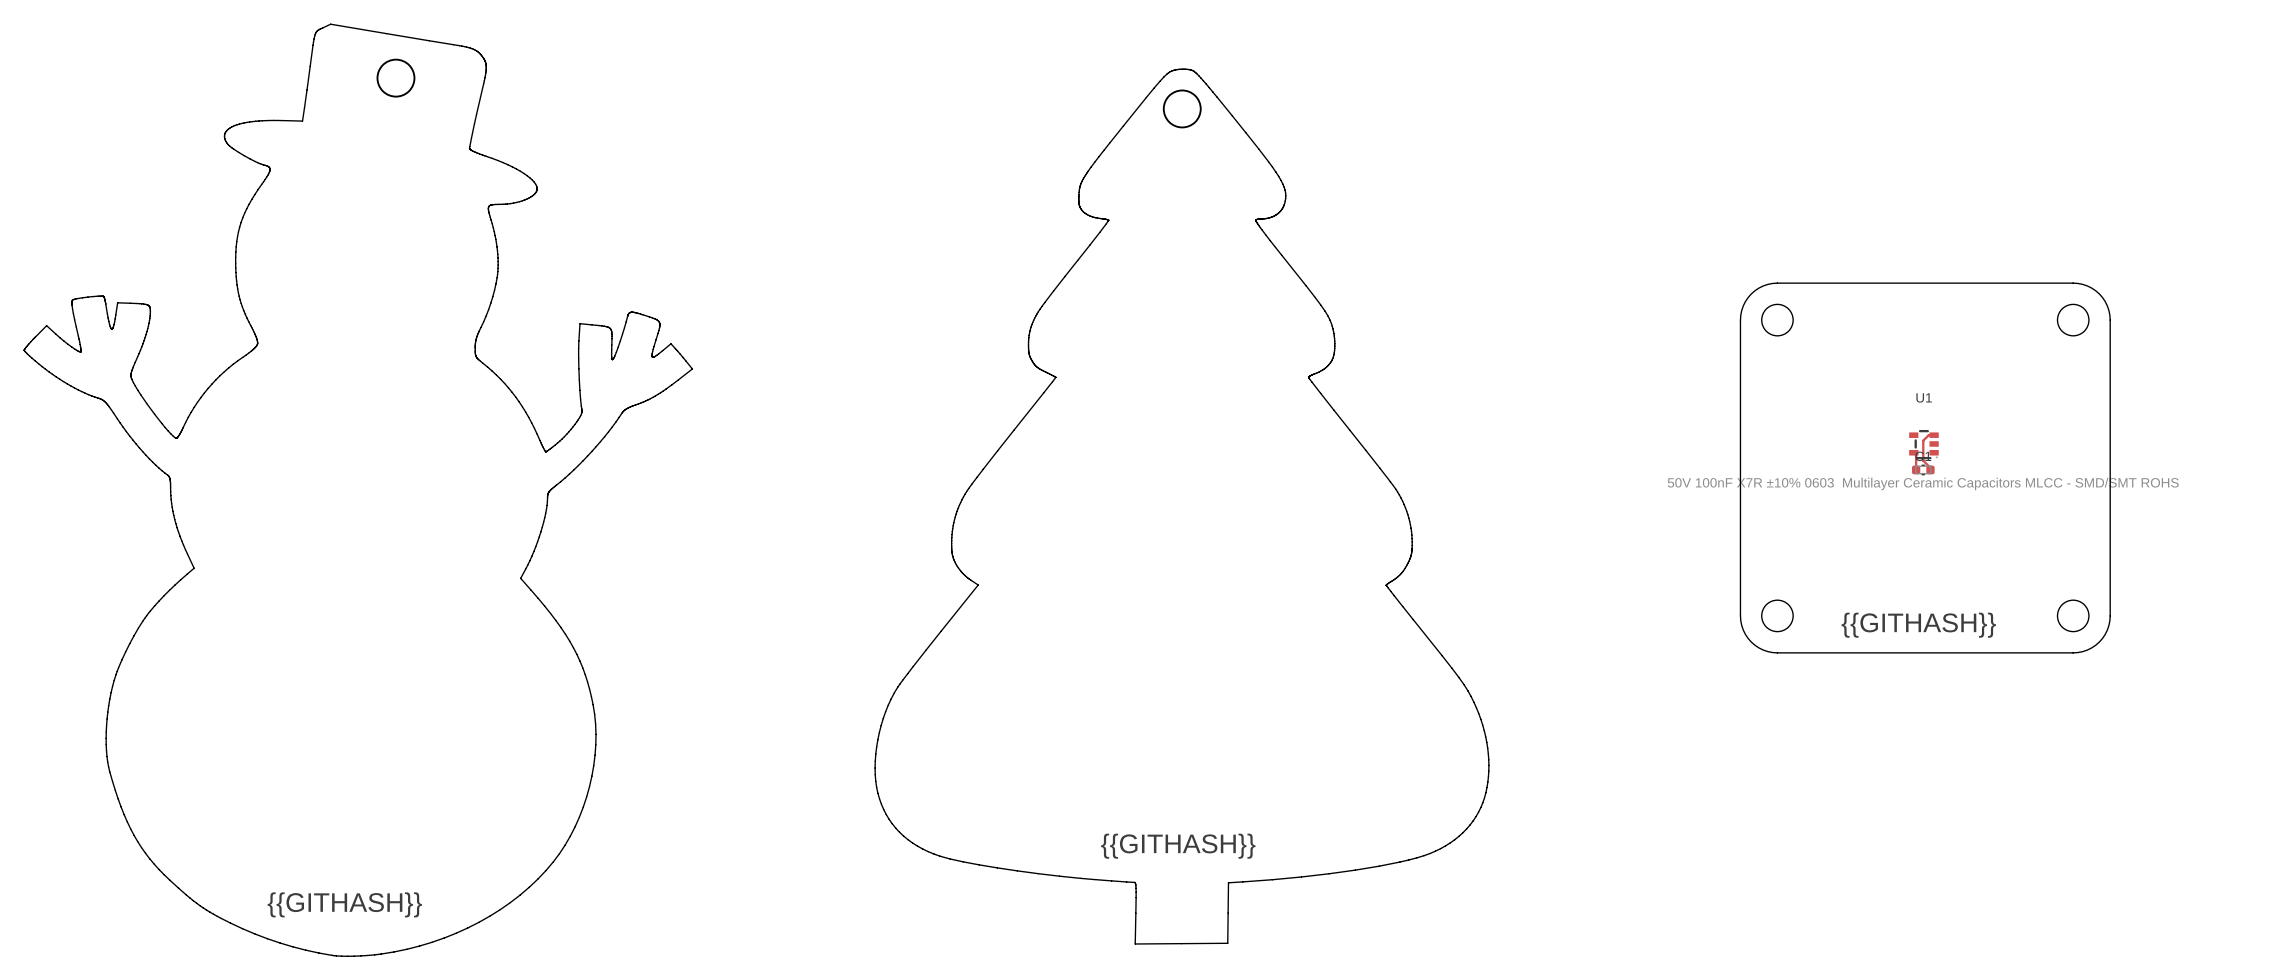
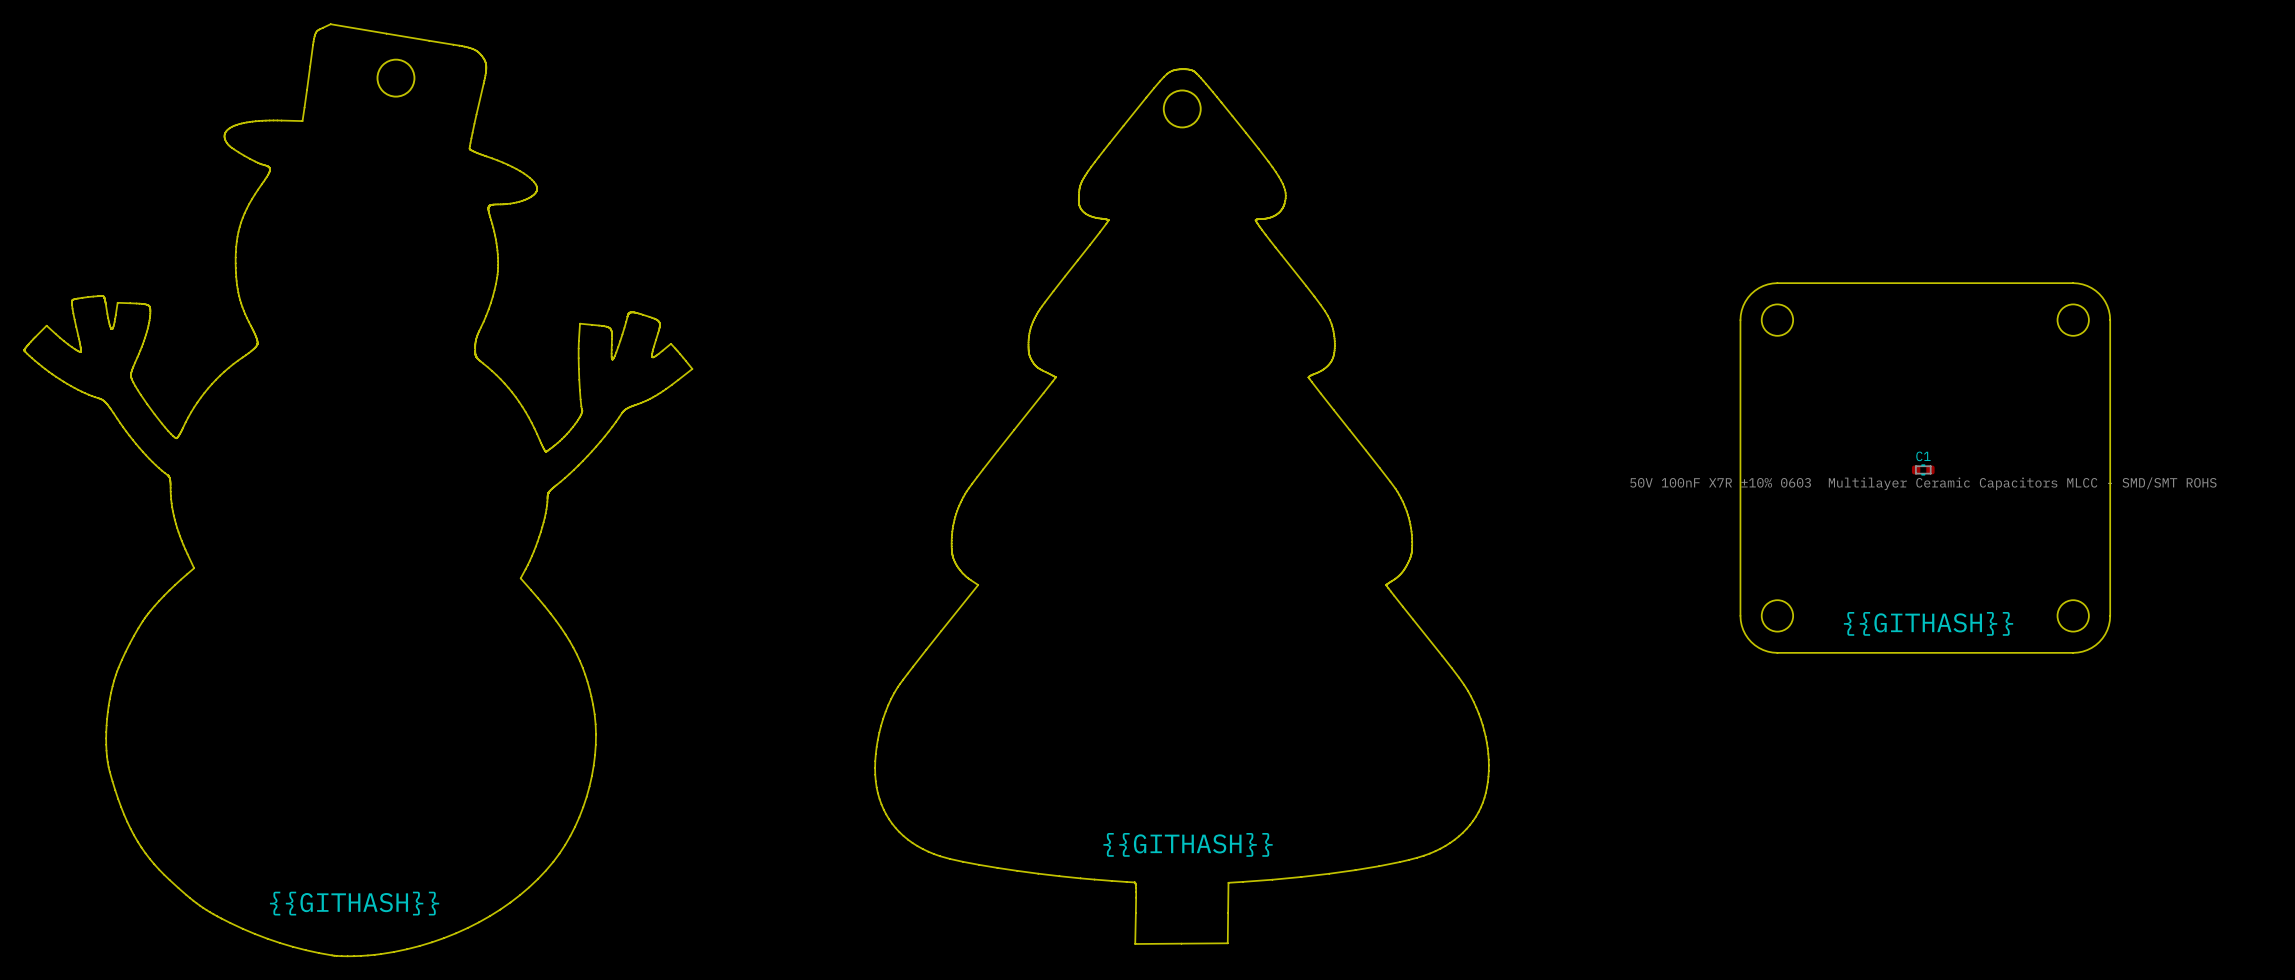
track: (1934, 435) (1928, 435) (1923, 440) (1923, 460) (1930, 469) -> none
U1: (1923, 444) -> none
track: (1913, 452) (1916, 455) (1916, 469) -> none

